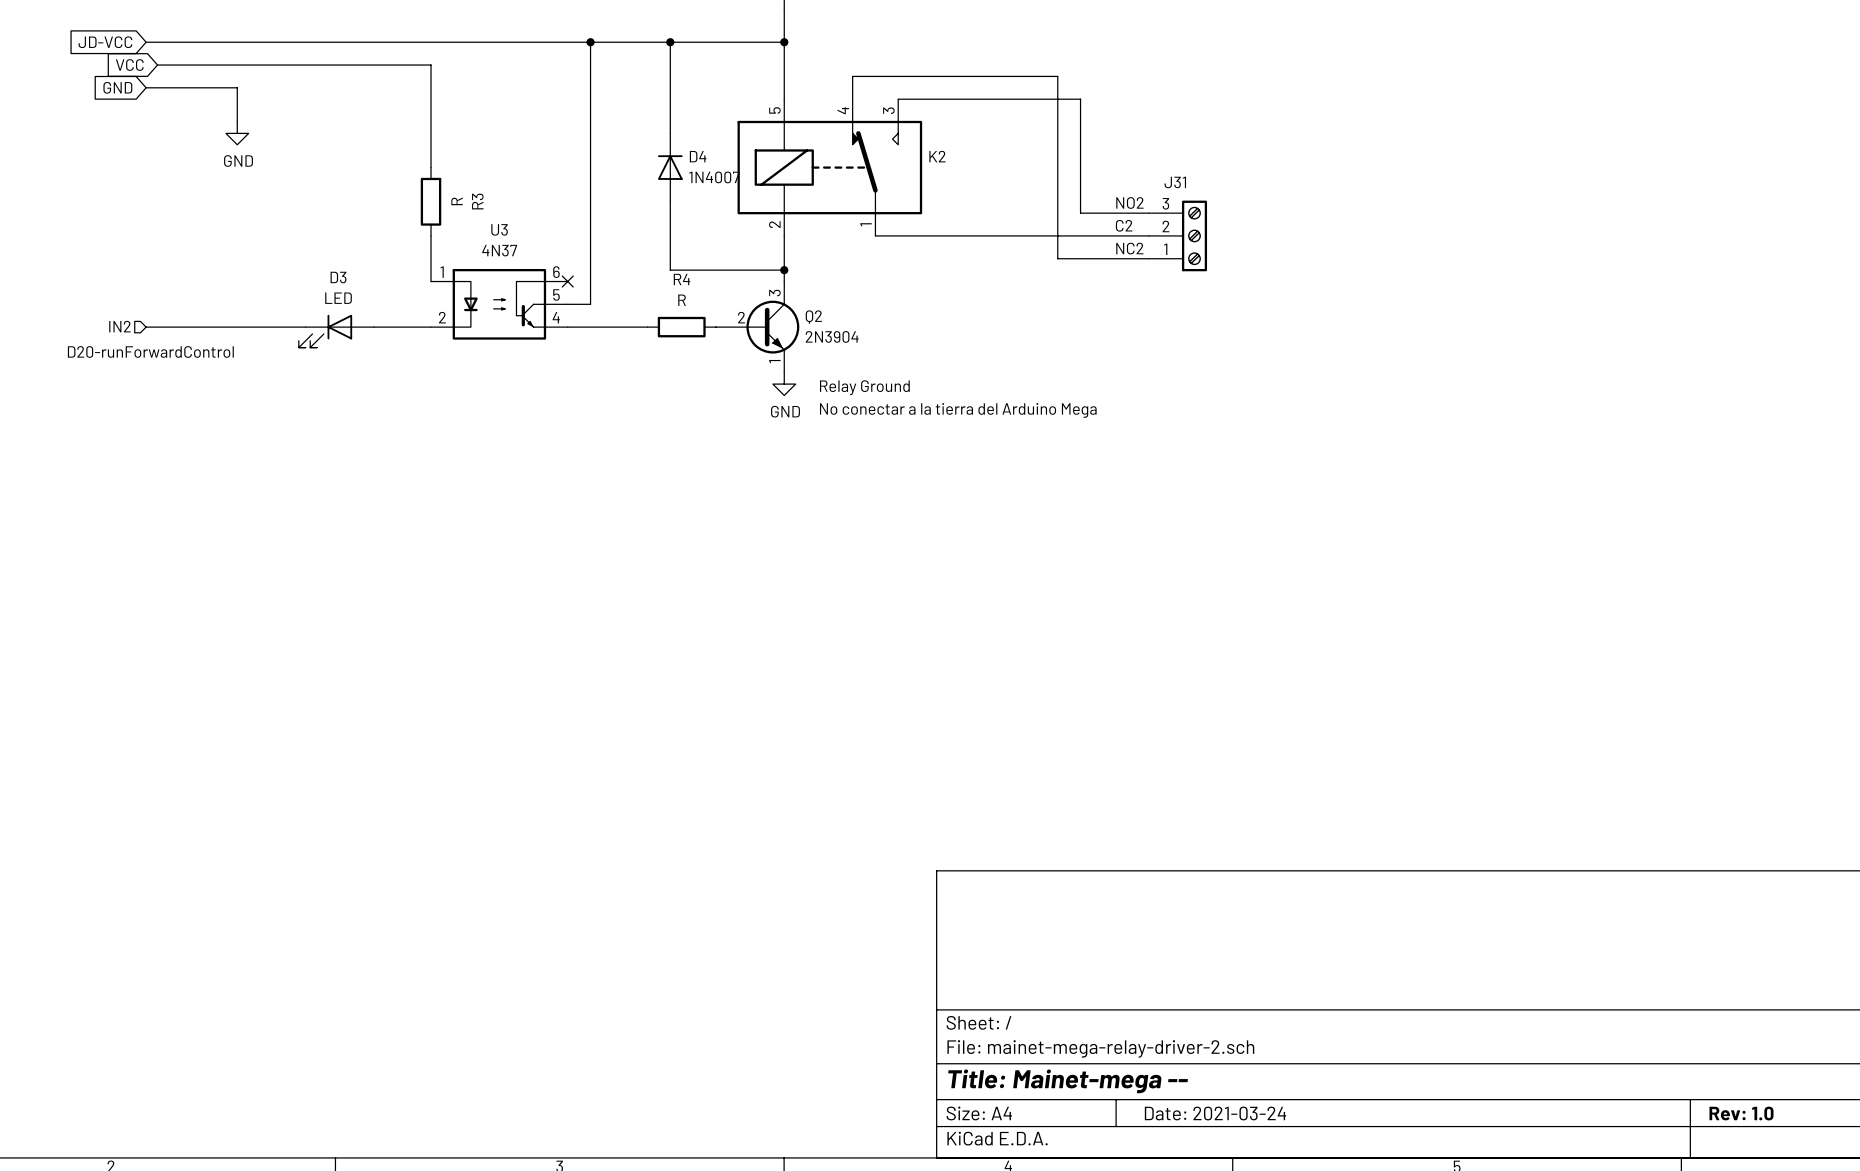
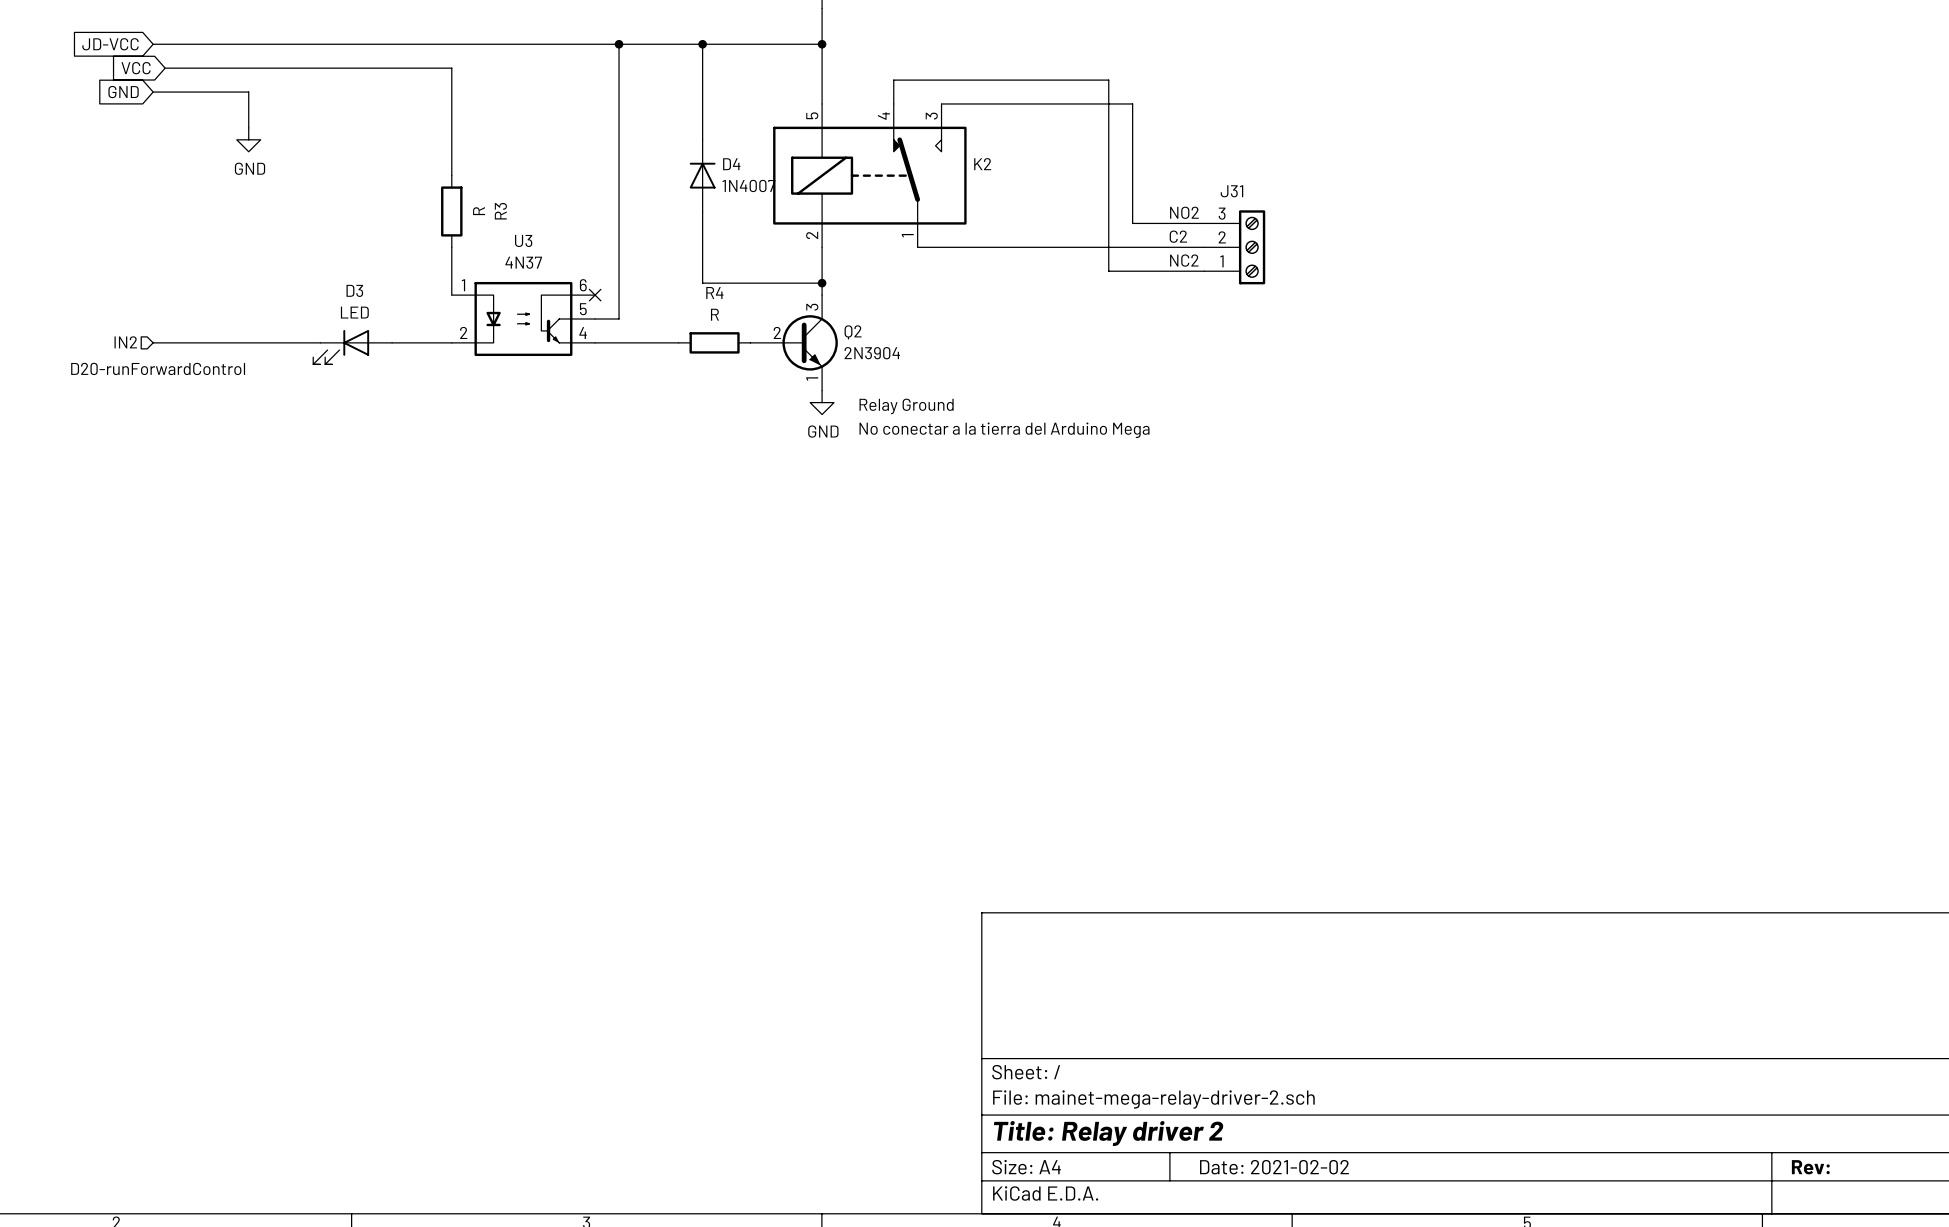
title block: Title: Mainet-mega -- (1068, 1081) -> Title: Relay driver 2 (1108, 1133)
title block: Date: 2021-03-24 (1215, 1113) -> Date: 2021-02-02 (1274, 1167)
title block: Rev: 1.0 (1741, 1113) -> Rev: (1810, 1167)

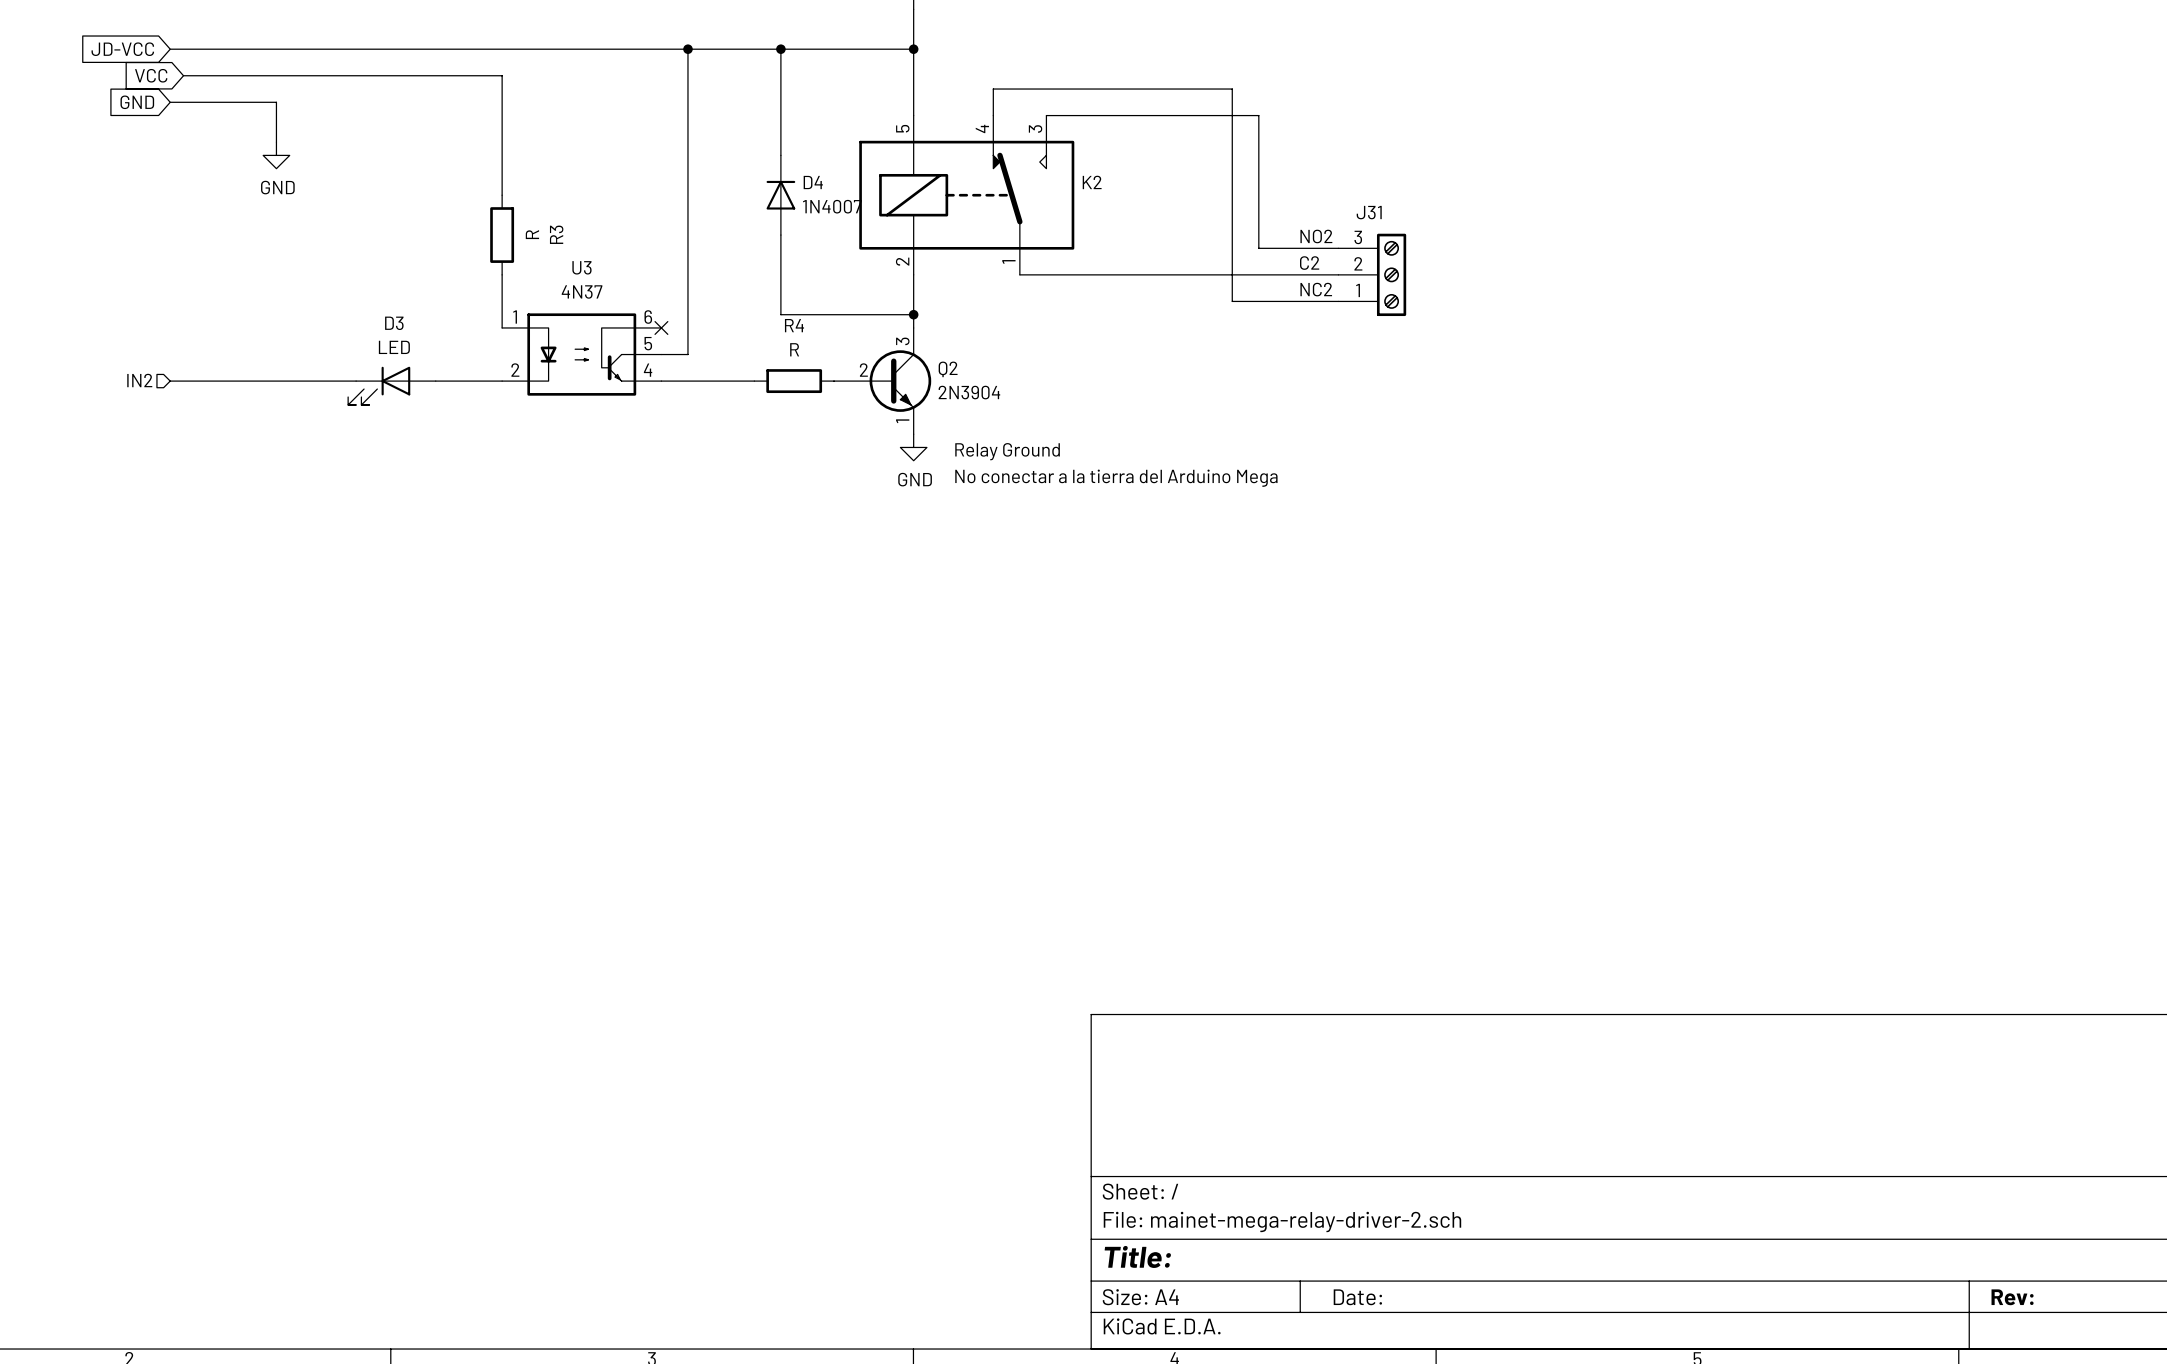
text: D20-runForwardControl (158, 368) -> none
title block: Title: Relay driver 2 (1108, 1133) -> Title: (1137, 1256)
title block: Date: 2021-02-02 (1274, 1167) -> Date: (1357, 1297)

